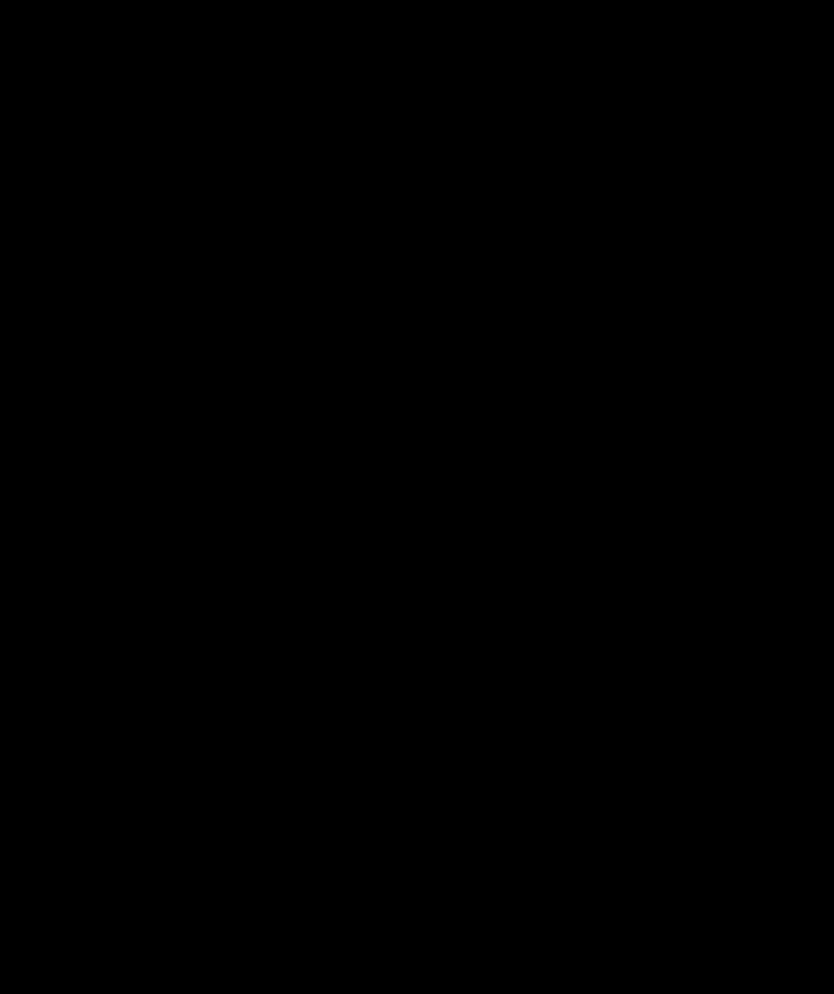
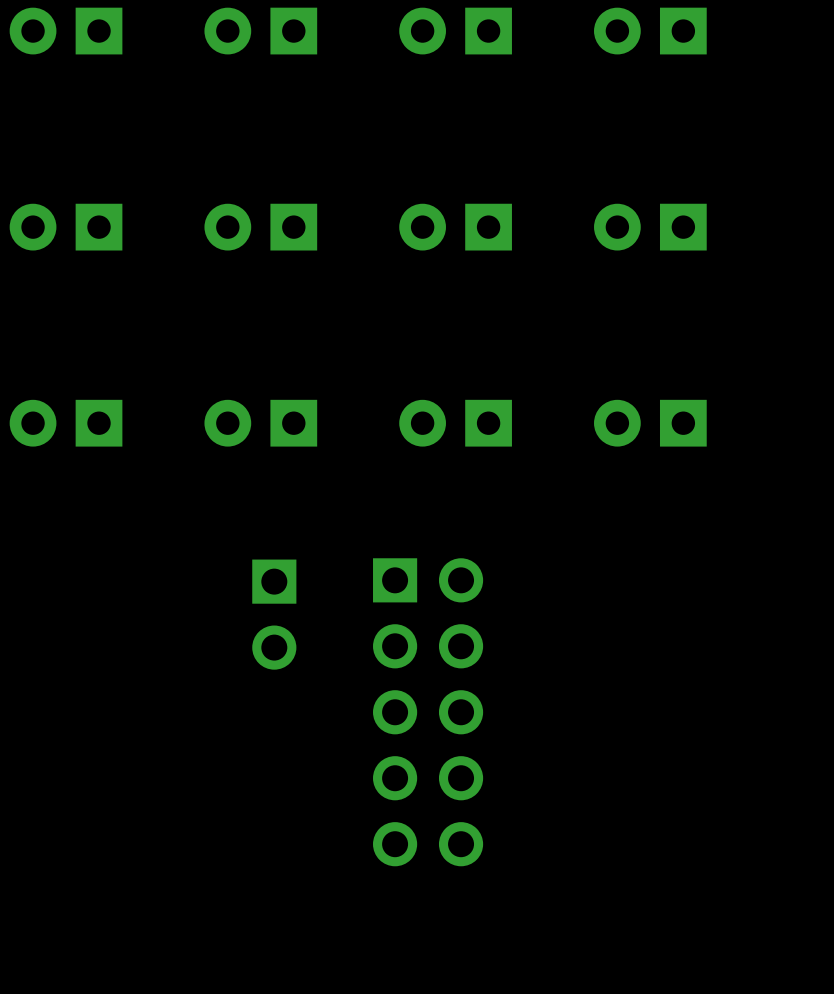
part: none -> (66, 31)
part: none -> (260, 31)
part: none -> (455, 31)
part: none -> (650, 31)
part: none -> (66, 227)
part: none -> (260, 227)
part: none -> (455, 227)
part: none -> (650, 227)
part: none -> (66, 423)
part: none -> (260, 423)
part: none -> (455, 423)
part: none -> (650, 423)
part: none -> (274, 614)
part: none -> (428, 712)

